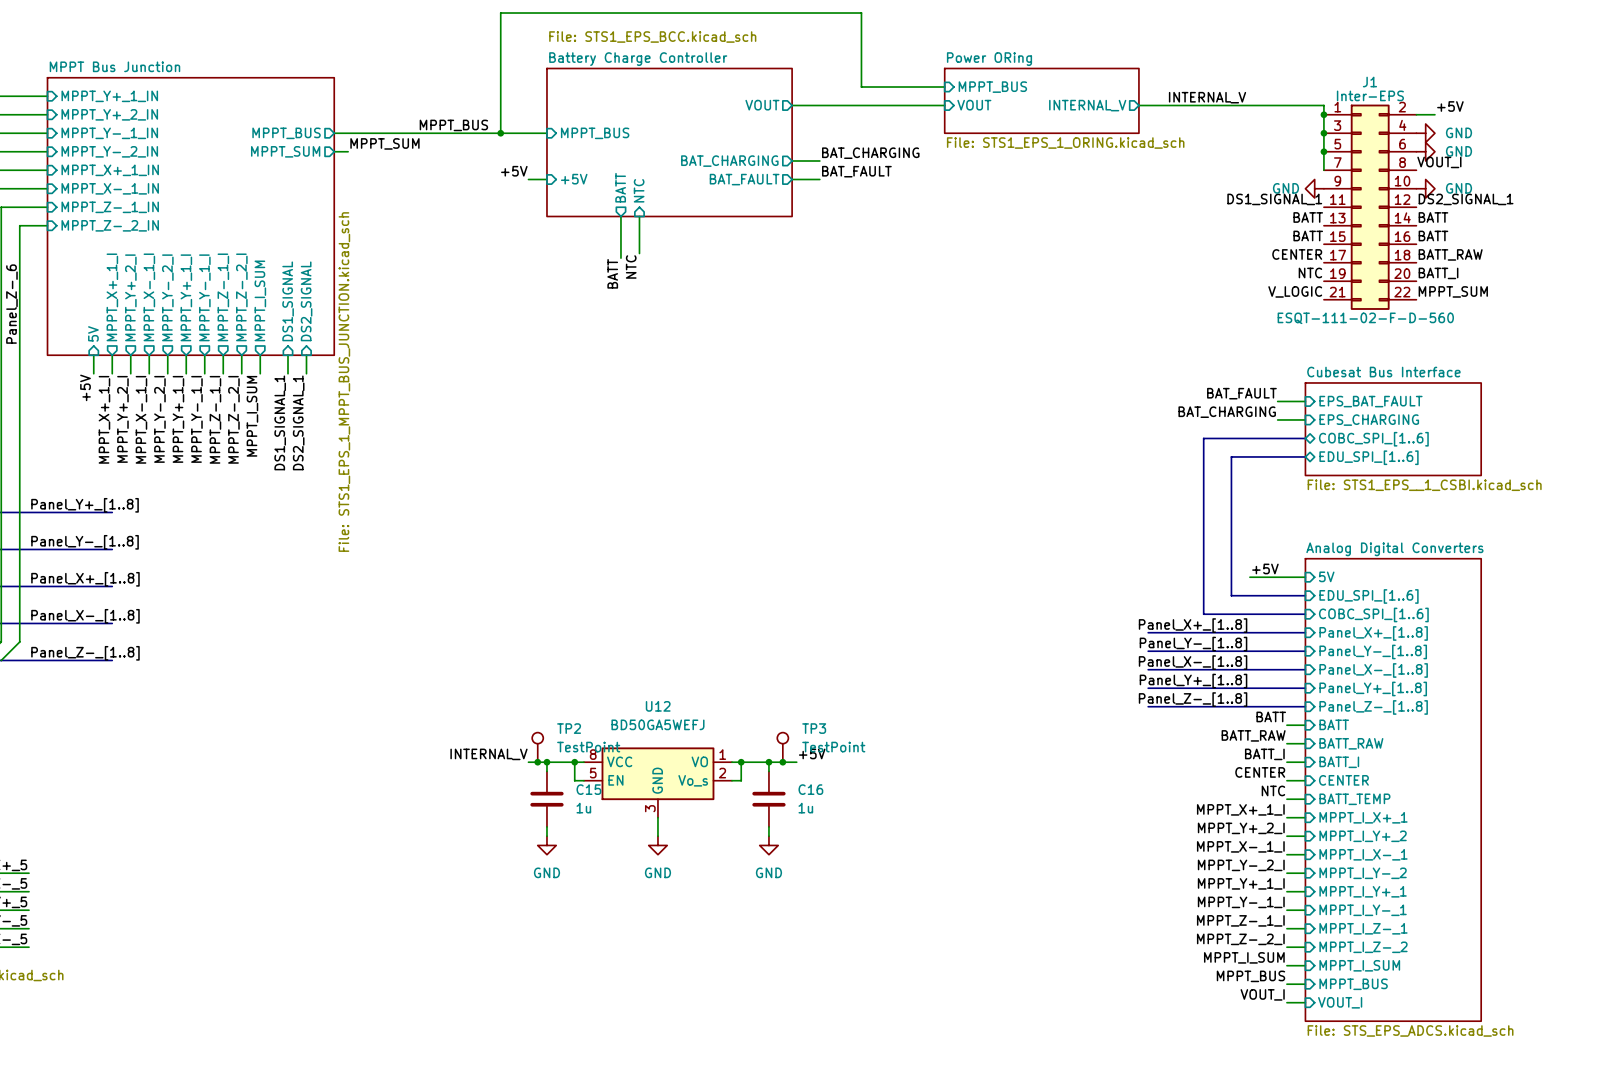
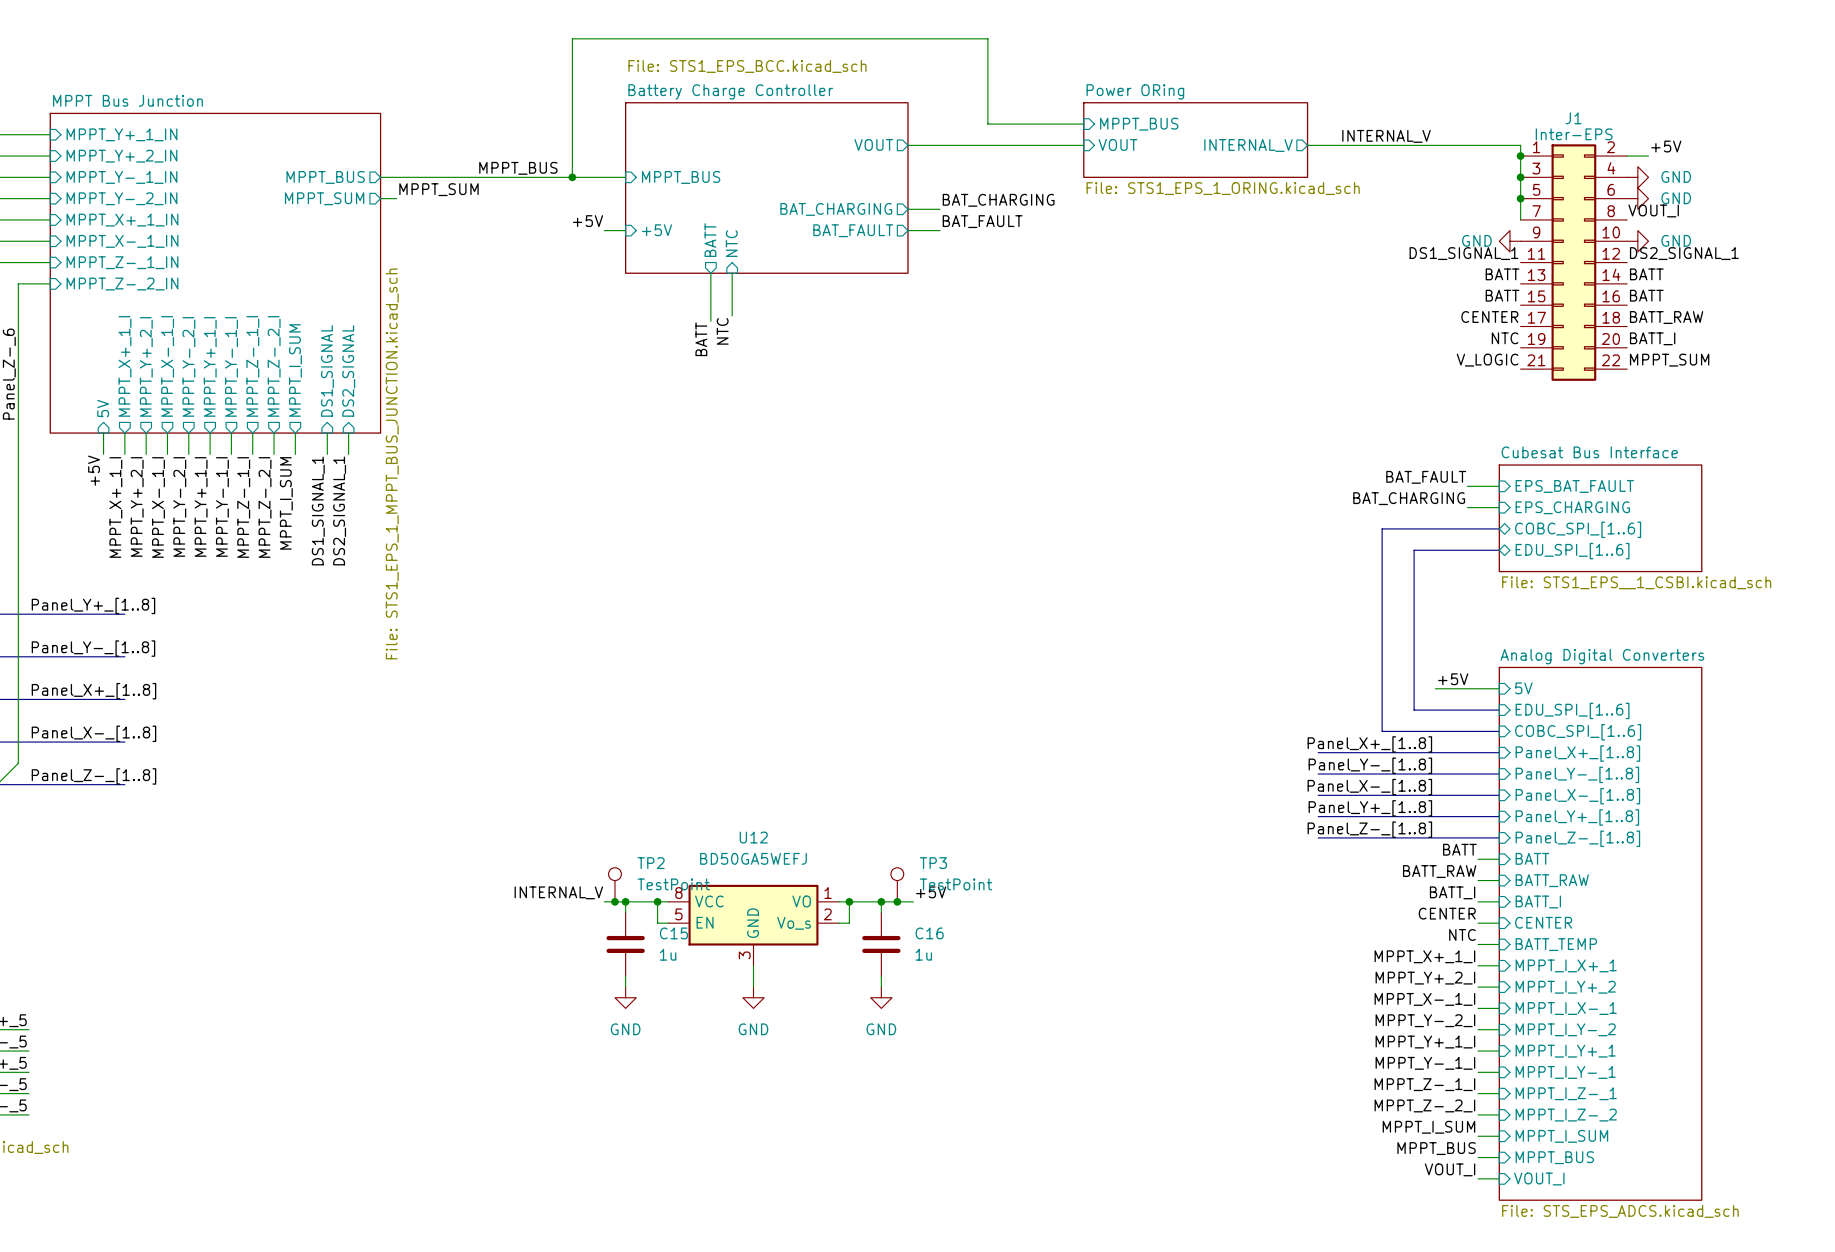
J1 text: ESQT-111-02-F-D-560 (1365, 318) -> none

